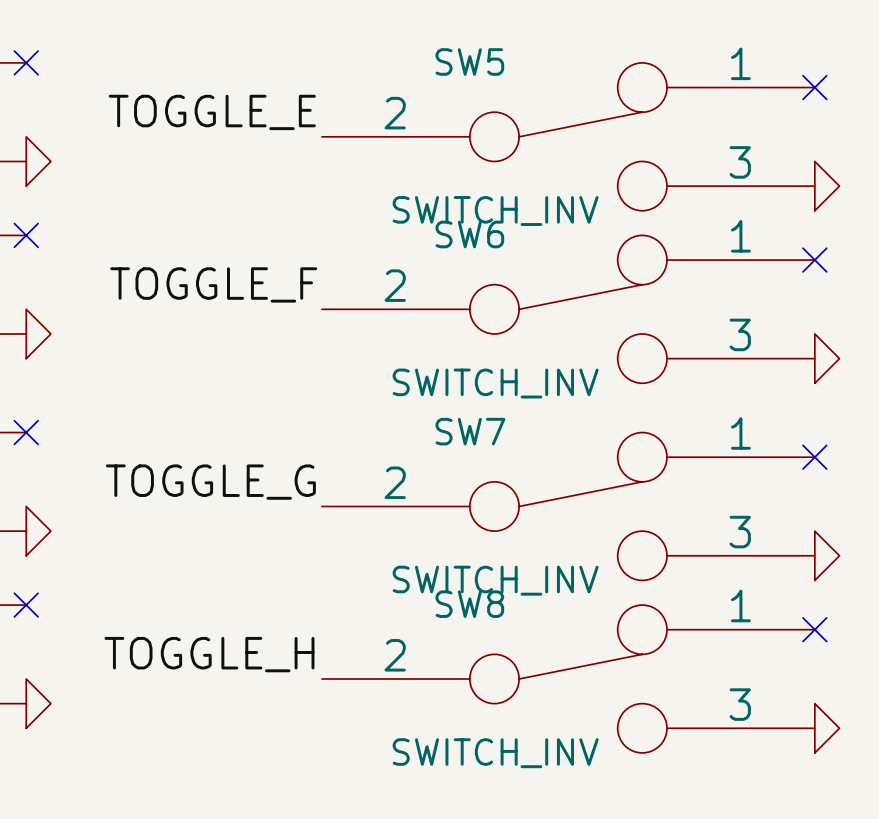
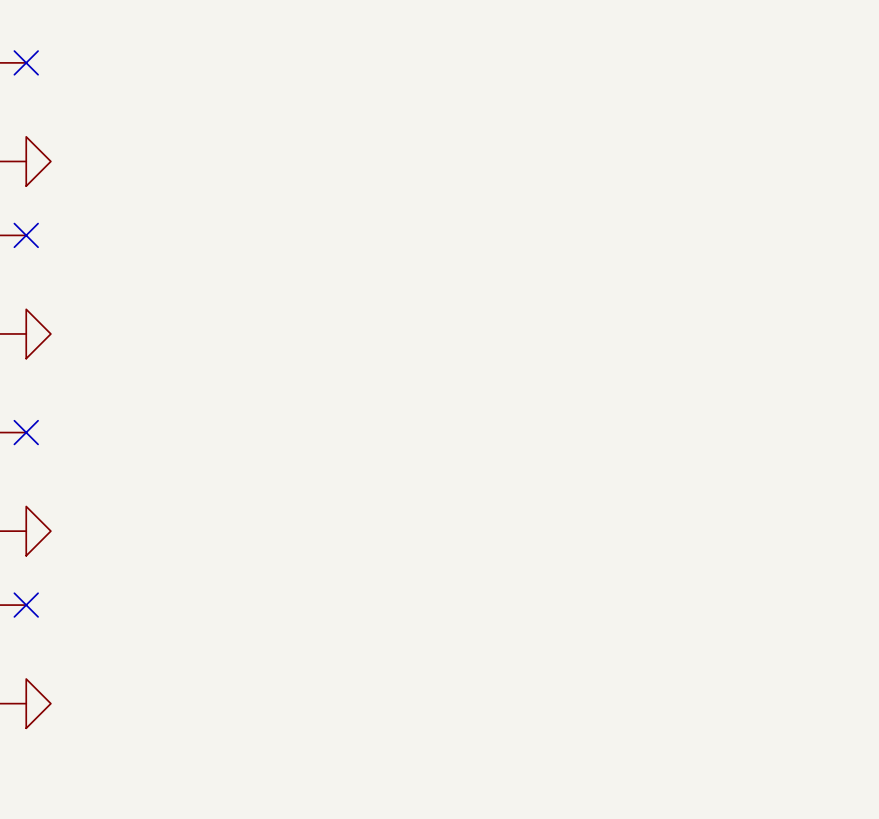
no-connect mark: (814, 87) -> none
label: TOGGLE_E (212, 112) -> none
SW5: SWITCH_INV (568, 136) -> none
power symbol: (827, 186) -> none
no-connect mark: (814, 260) -> none
label: TOGGLE_F (213, 284) -> none
SW6: SWITCH_INV (568, 309) -> none
power symbol: (827, 358) -> none
no-connect mark: (814, 457) -> none
label: TOGGLE_G (210, 482) -> none
SW7: SWITCH_INV (568, 506) -> none
power symbol: (827, 555) -> none
no-connect mark: (814, 629) -> none
label: TOGGLE_H (209, 654) -> none
SW8: SWITCH_INV (568, 679) -> none
power symbol: (827, 728) -> none

